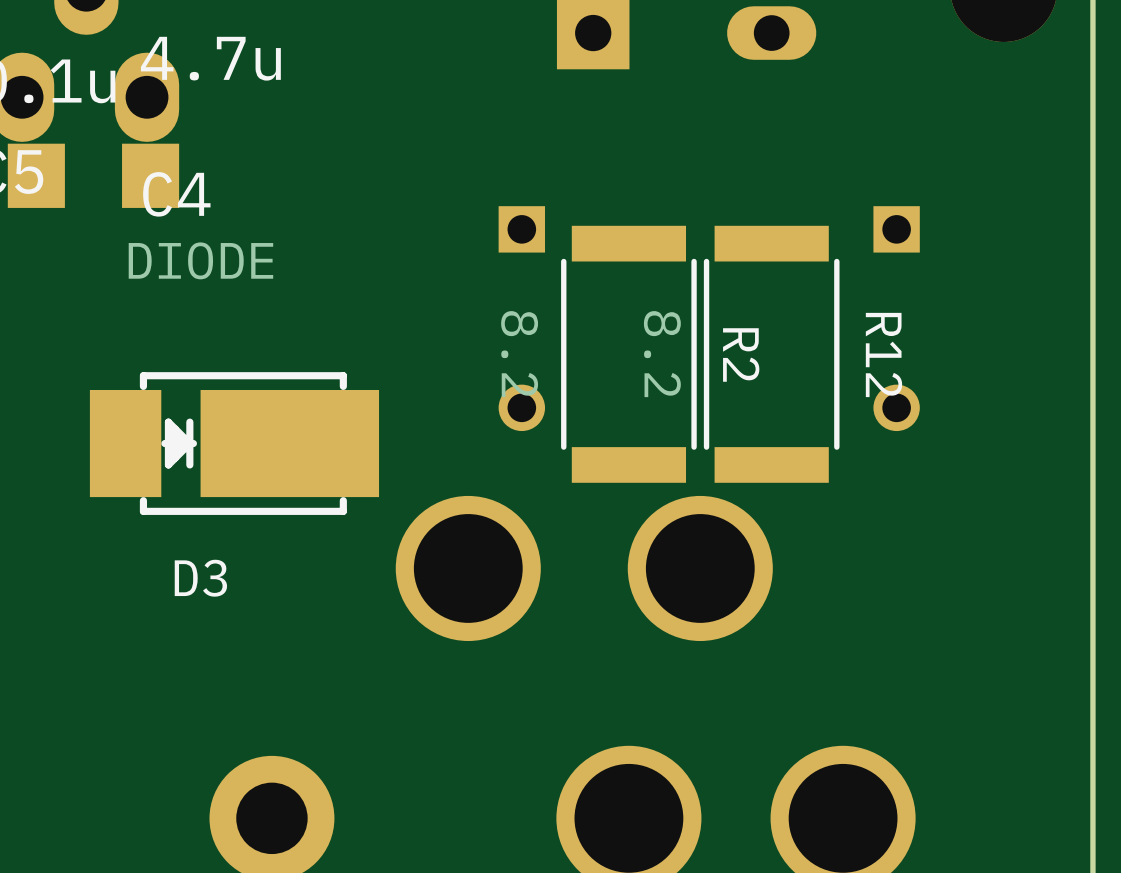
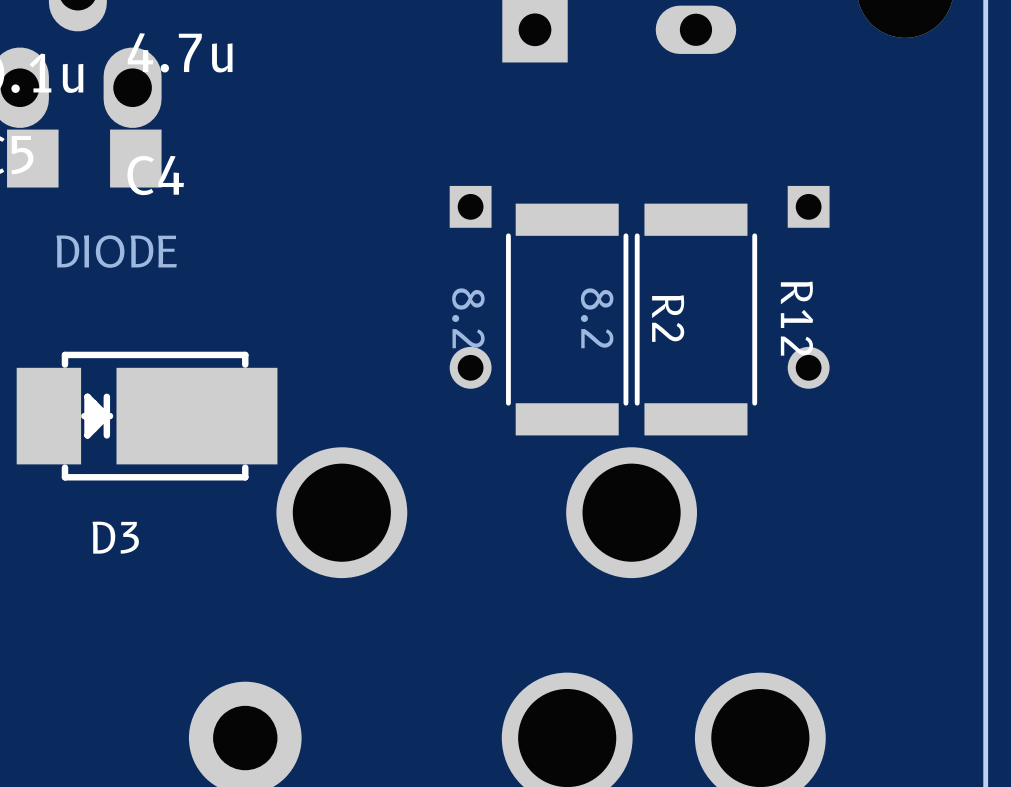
D3 position: (234, 443) -> (147, 416)
part position: (468, 568) -> (341, 512)

